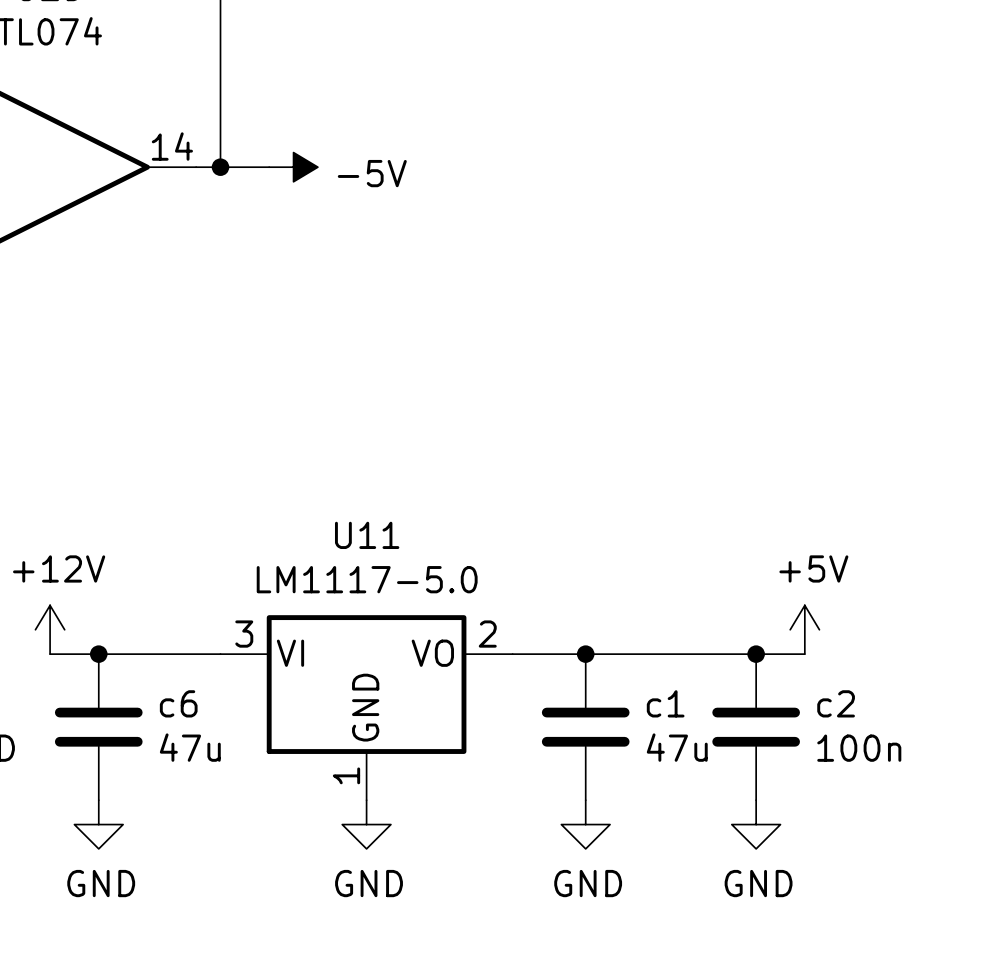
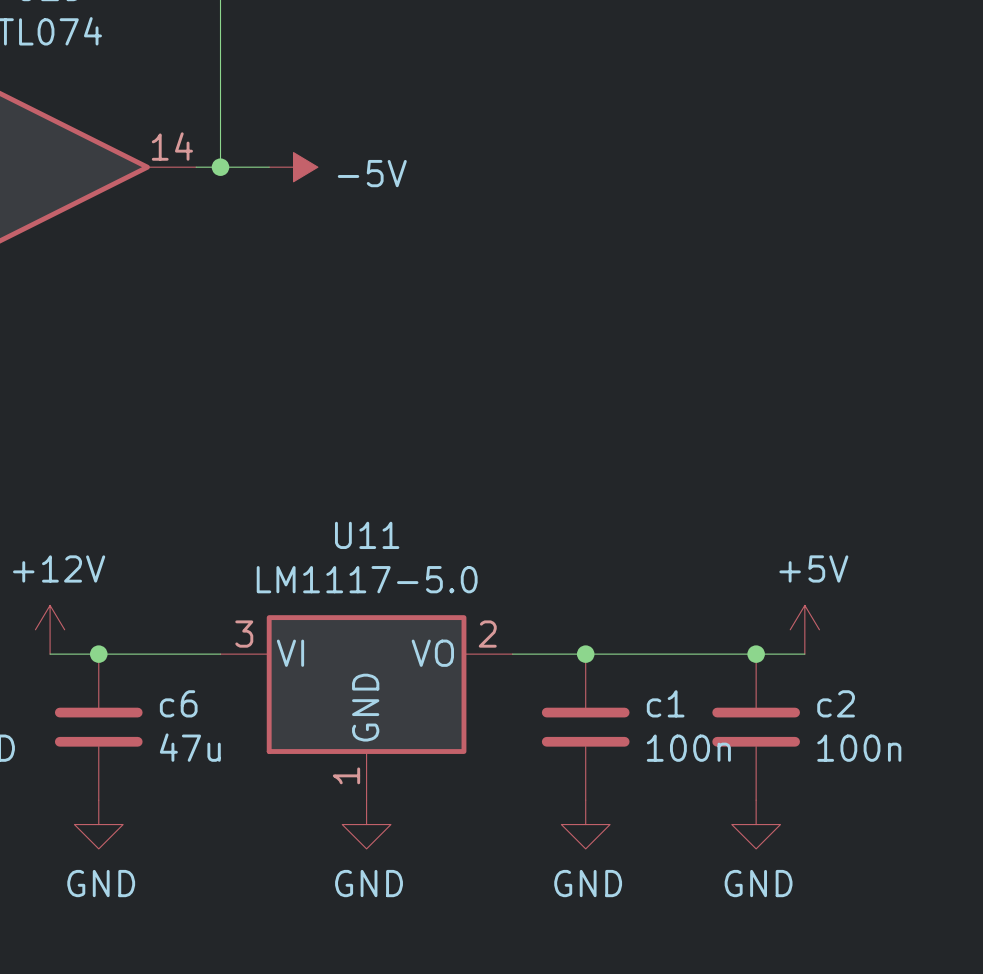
c1 value: 47u (677, 747) -> 100n (688, 748)

